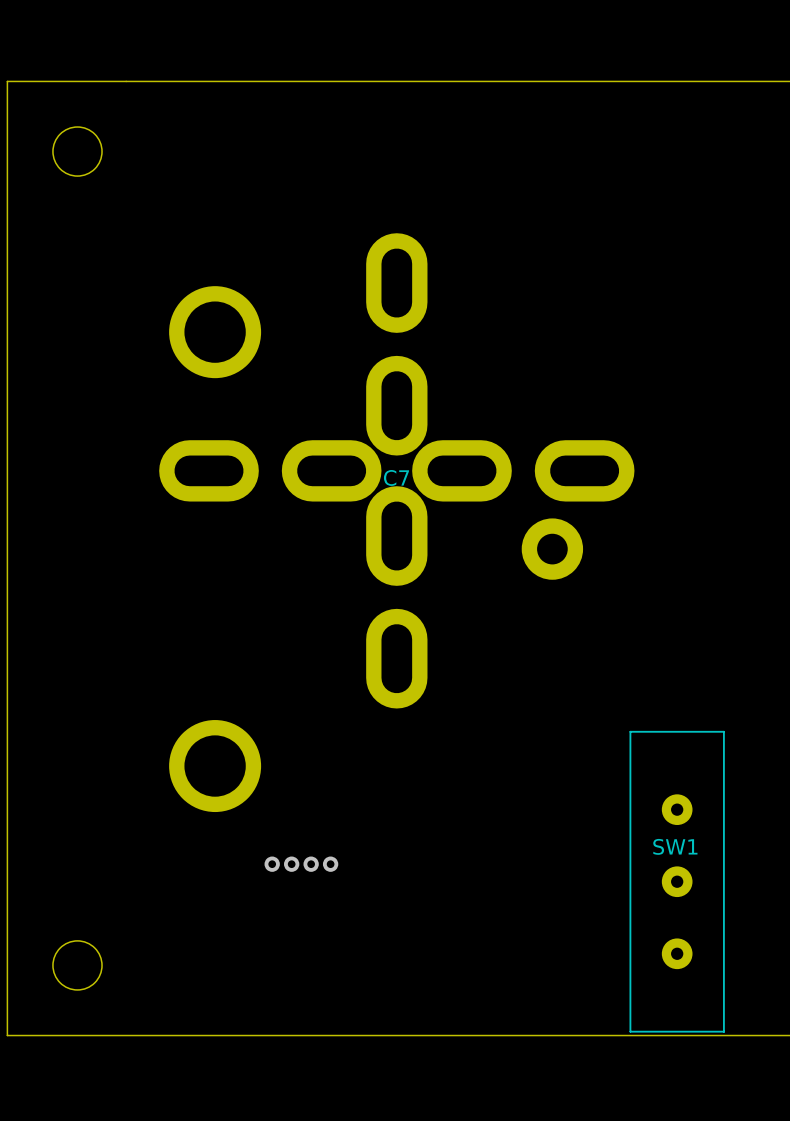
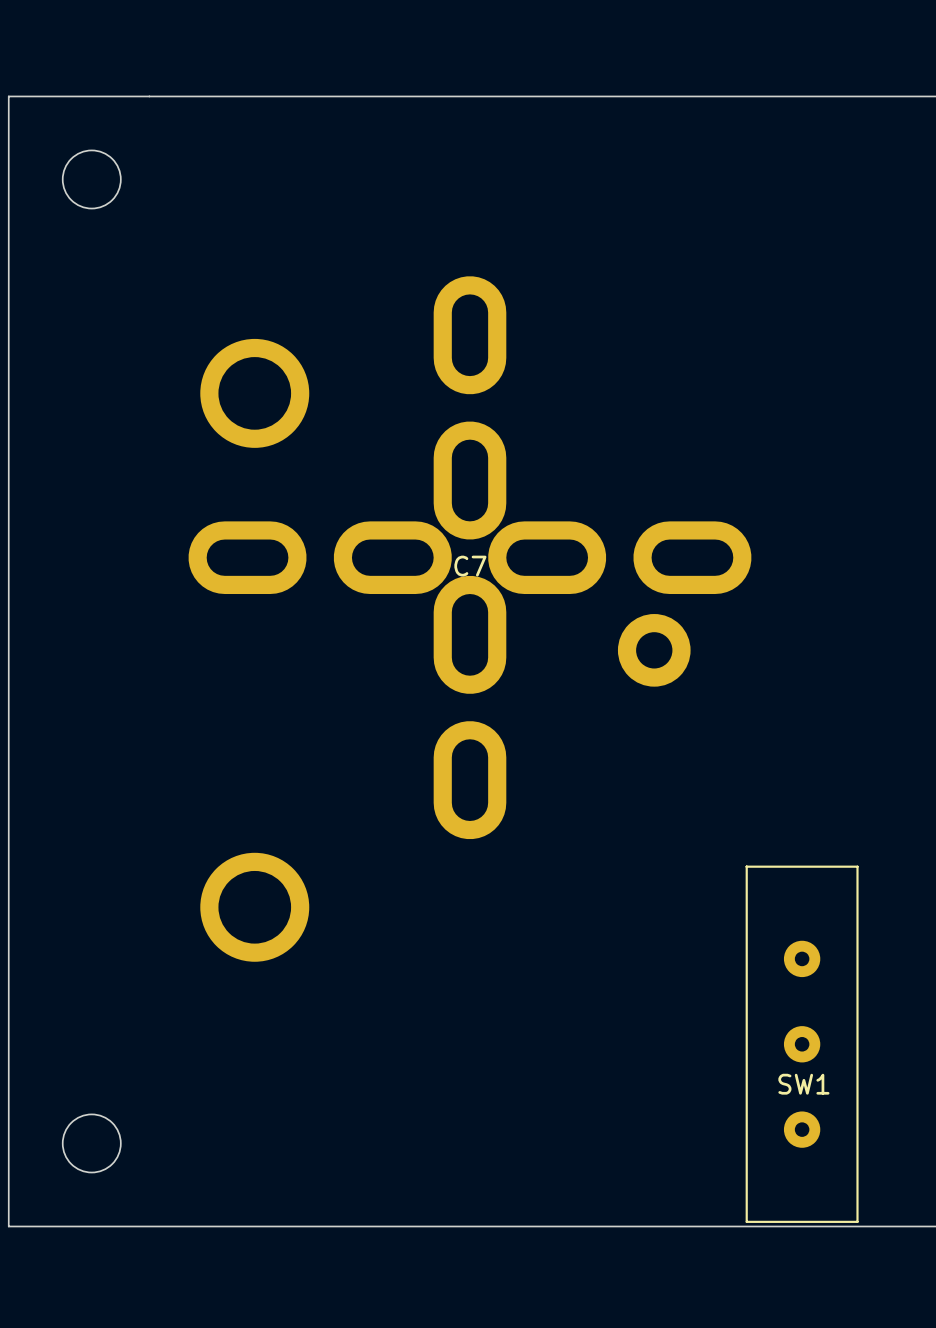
via: (272, 864) -> none
via: (291, 864) -> none
via: (311, 864) -> none
via: (330, 864) -> none
SW1 rotation: 0° (677, 881) -> 180° (802, 1044)

